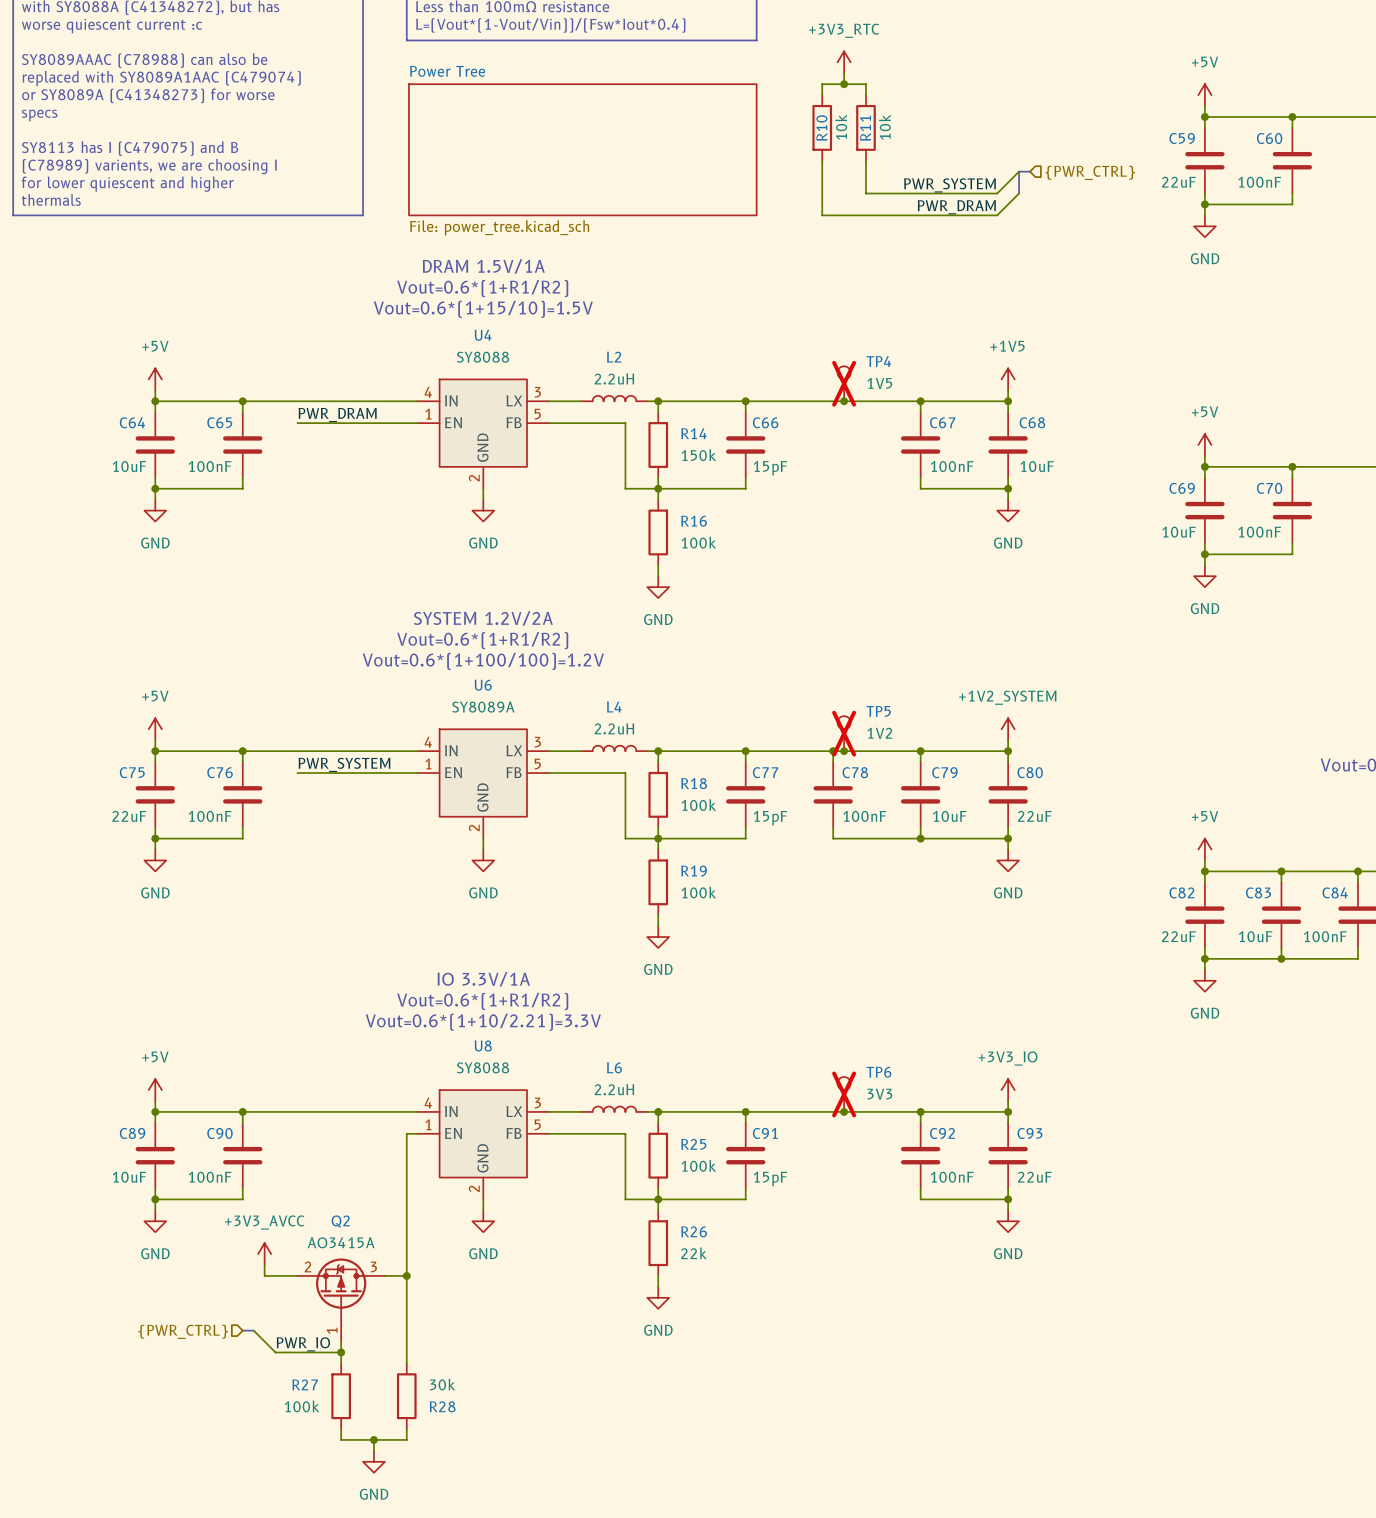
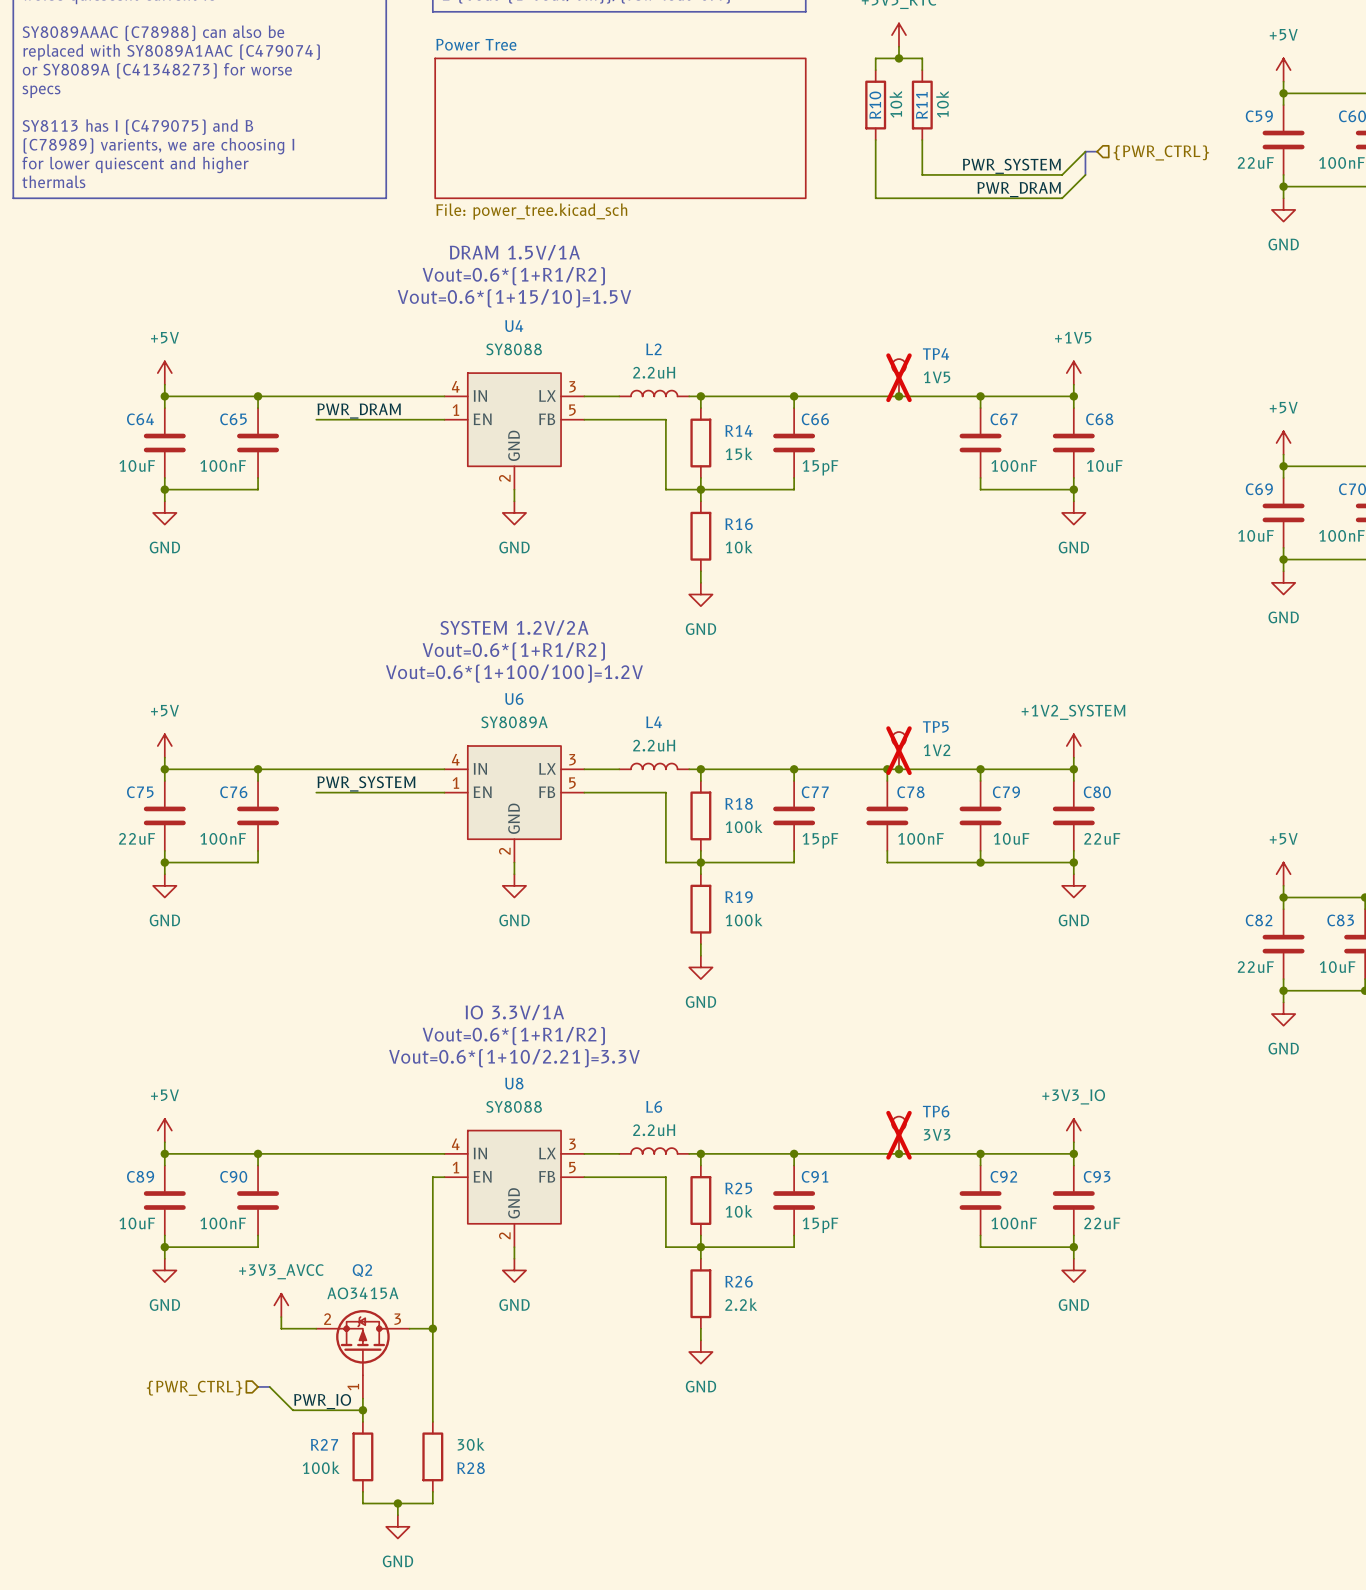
R14 value: 150k (698, 455) -> 15k (739, 453)
R16 value: 100k (698, 542) -> 10k (739, 547)
R25 value: 100k (698, 1165) -> 10k (739, 1211)
R26 value: 22k (693, 1253) -> 2.2k (741, 1304)

